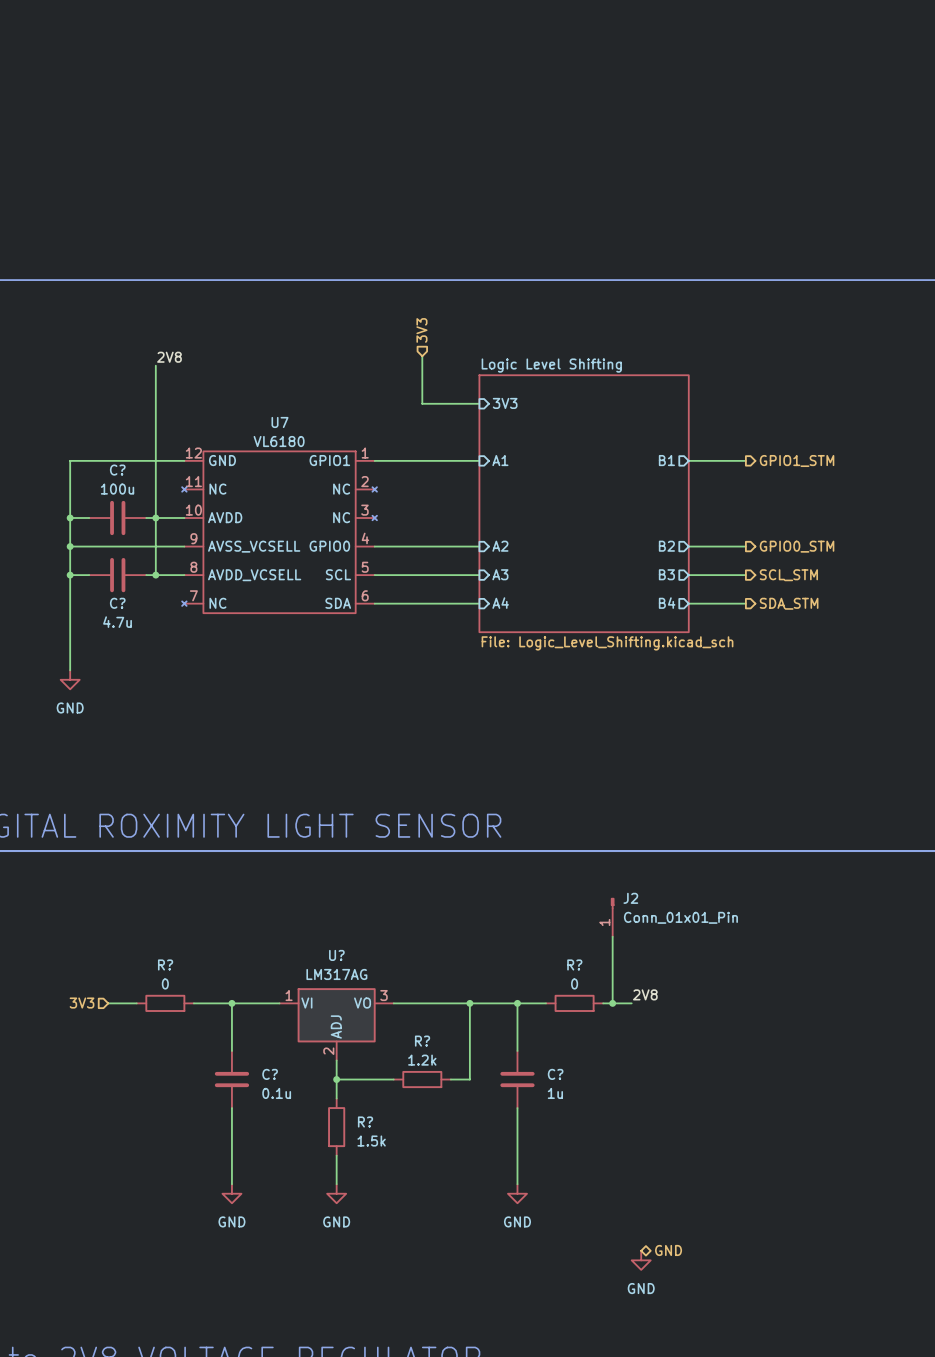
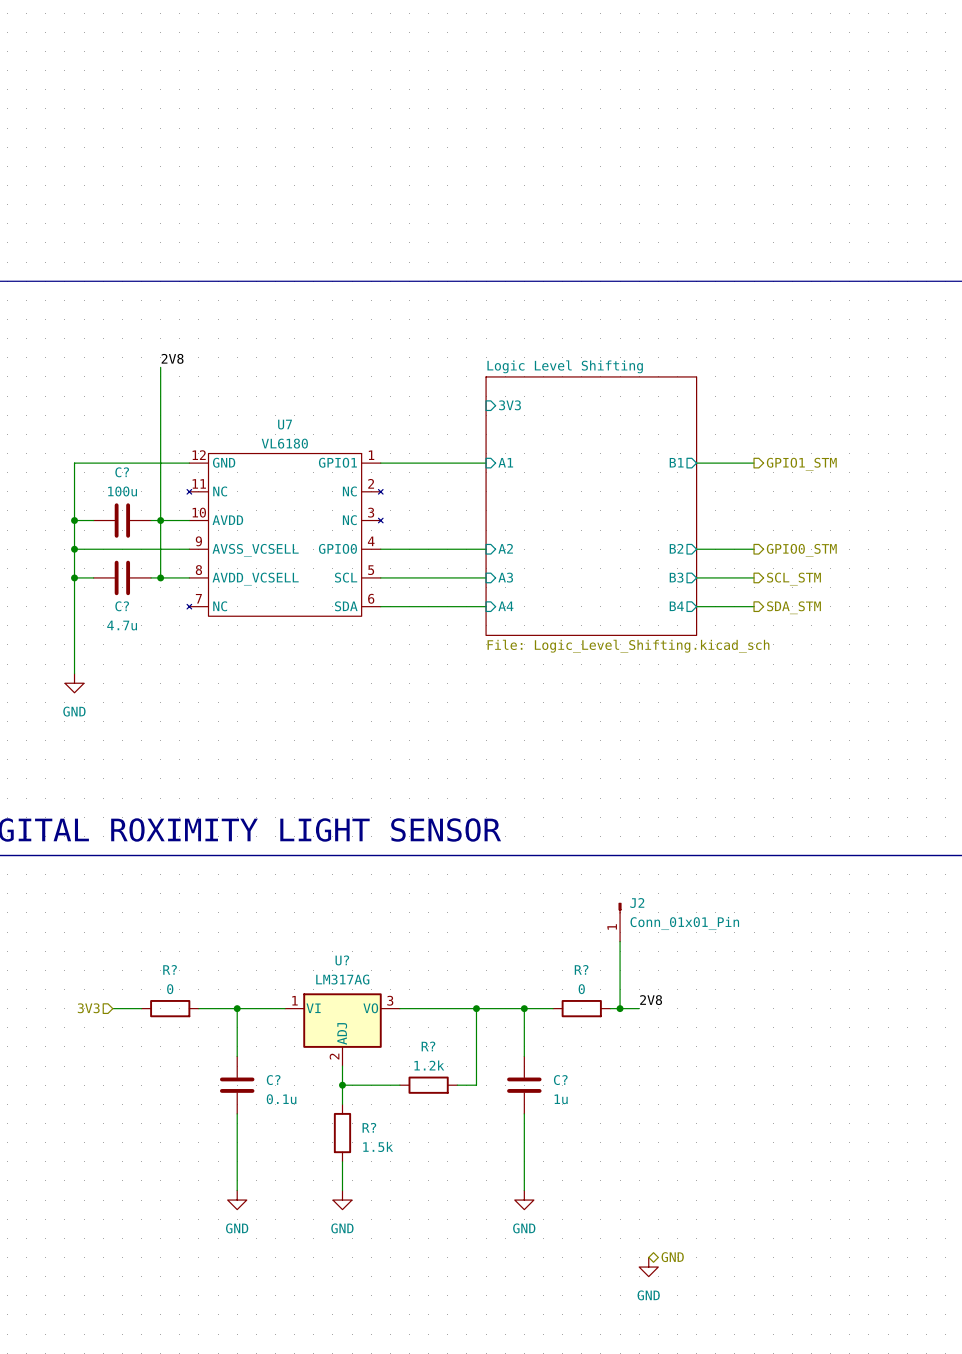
hierarchical label: 3V3 (421, 330) -> none
wire: (422, 356) (422, 403) (479, 403) -> none

